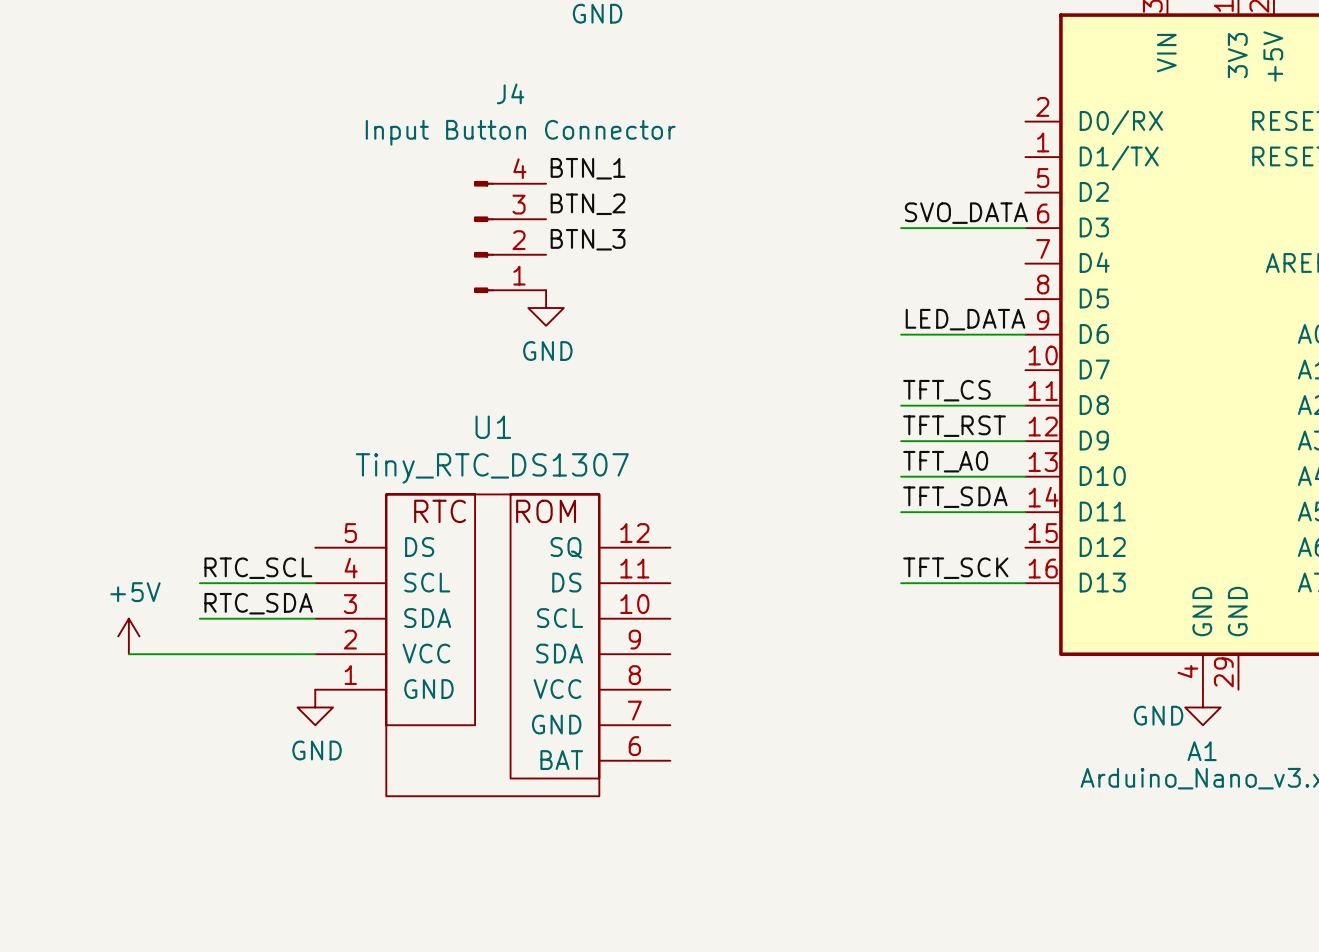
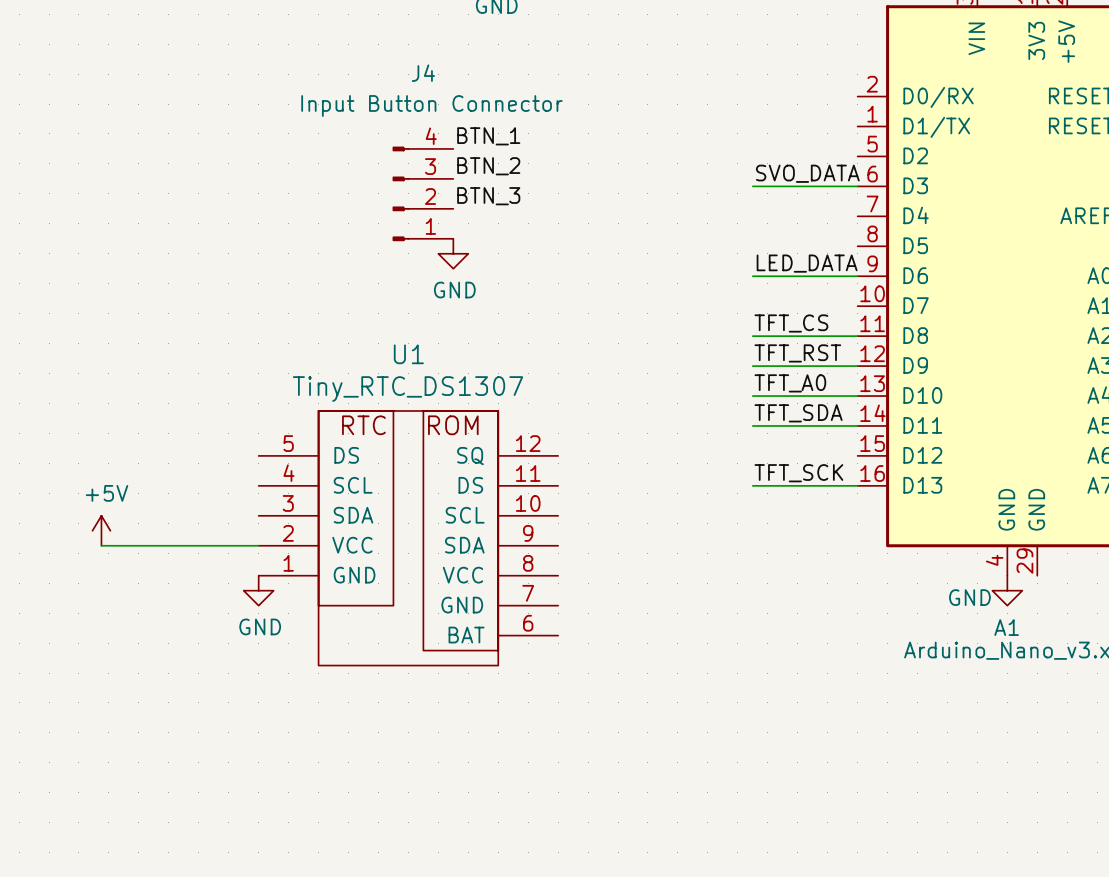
label: RTC_SCL (258, 568) -> none
wire: (199, 583) (315, 583) -> none
label: RTC_SDA (258, 603) -> none
wire: (199, 618) (315, 618) -> none

